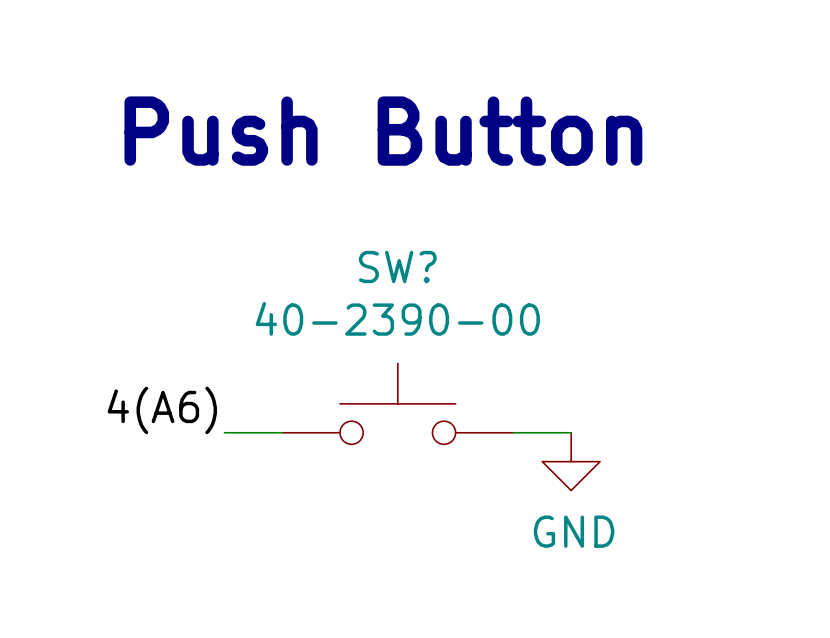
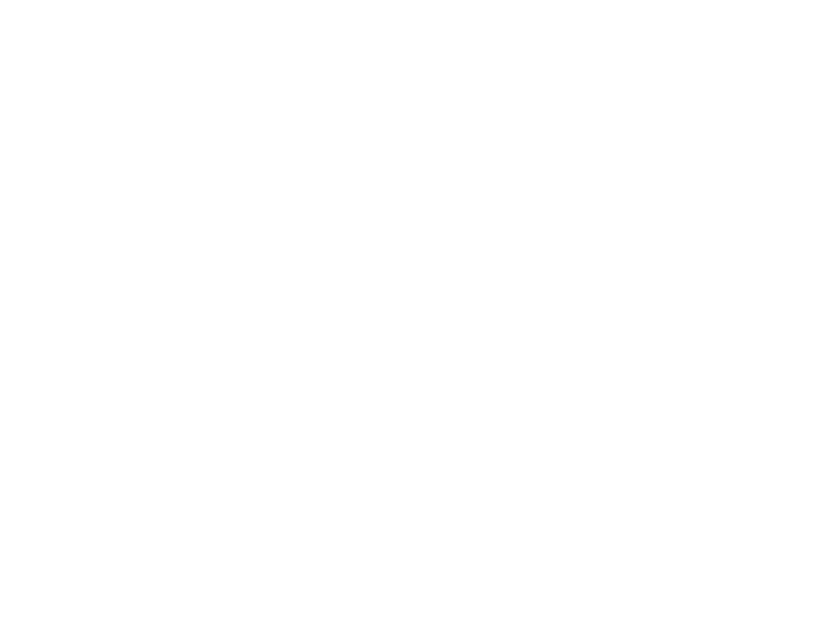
text: Push Button (383, 131) -> none
SW?: 40-2390-00 (397, 403) -> none
label: 4(A6) (162, 410) -> none
wire: (224, 432) (282, 432) -> none
wire: (513, 432) (571, 432) -> none
power symbol: GND (571, 461) -> none

